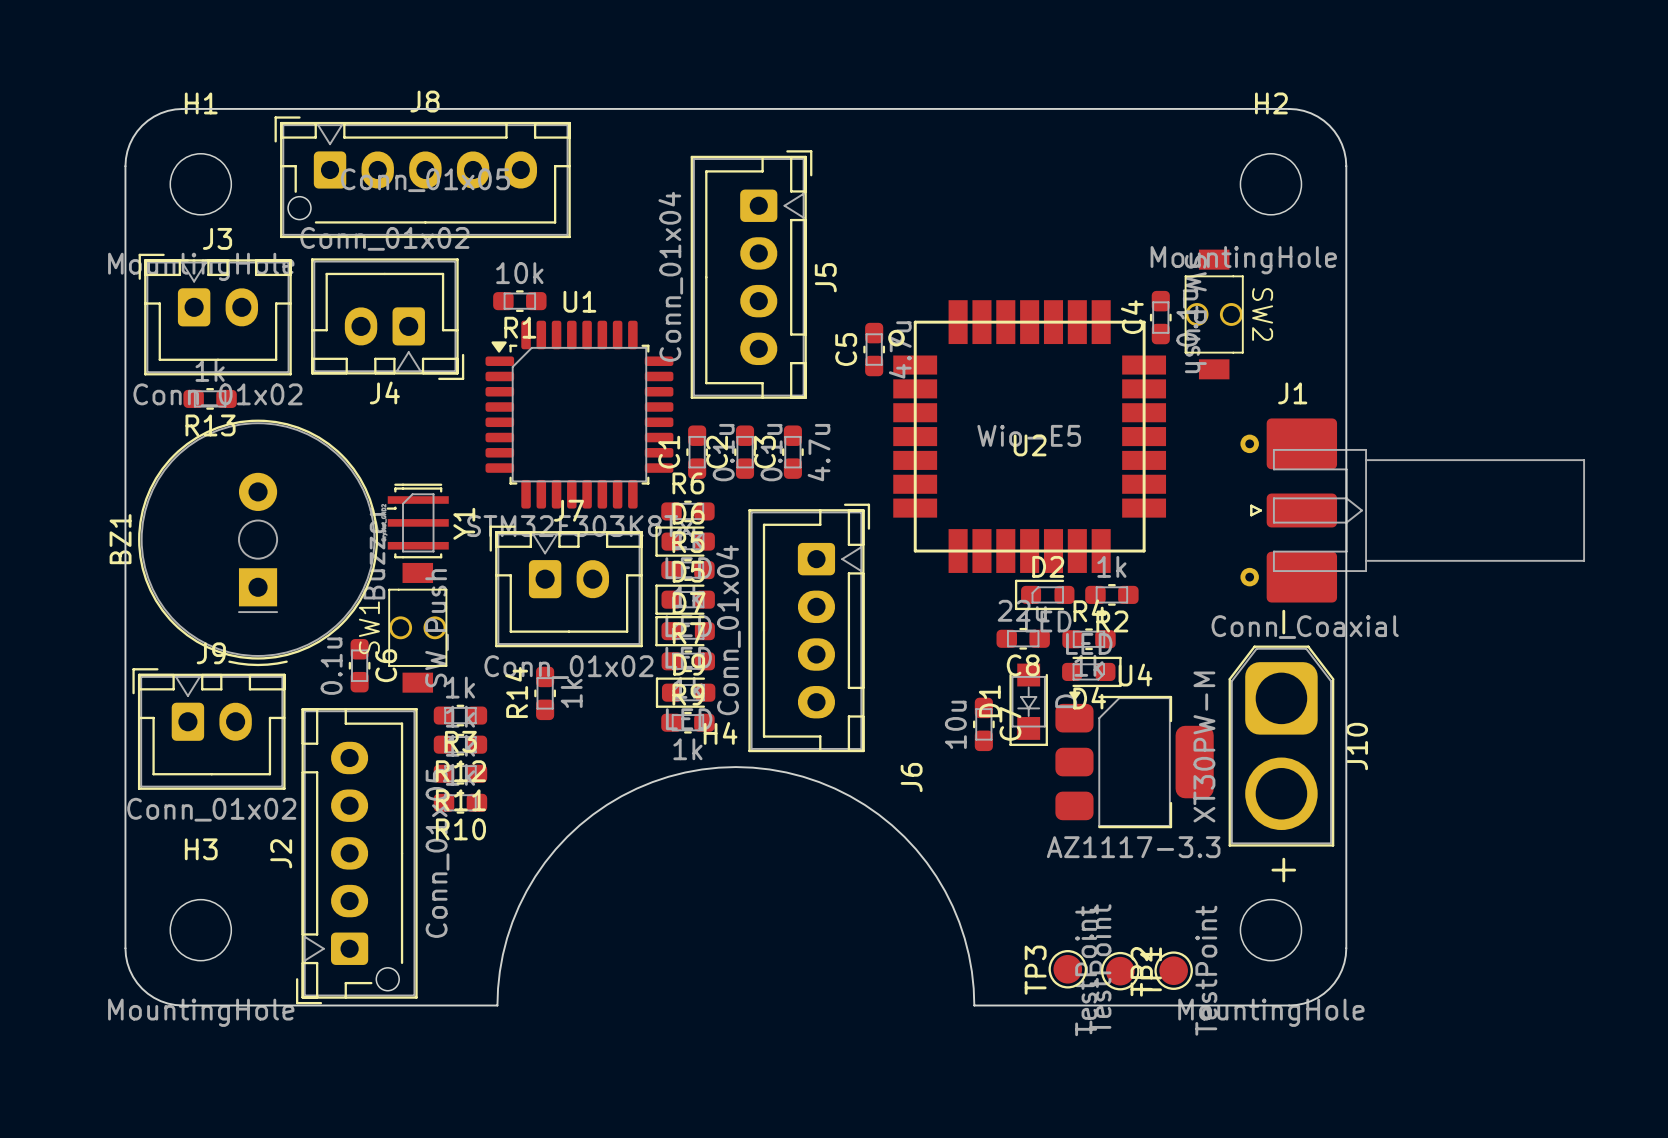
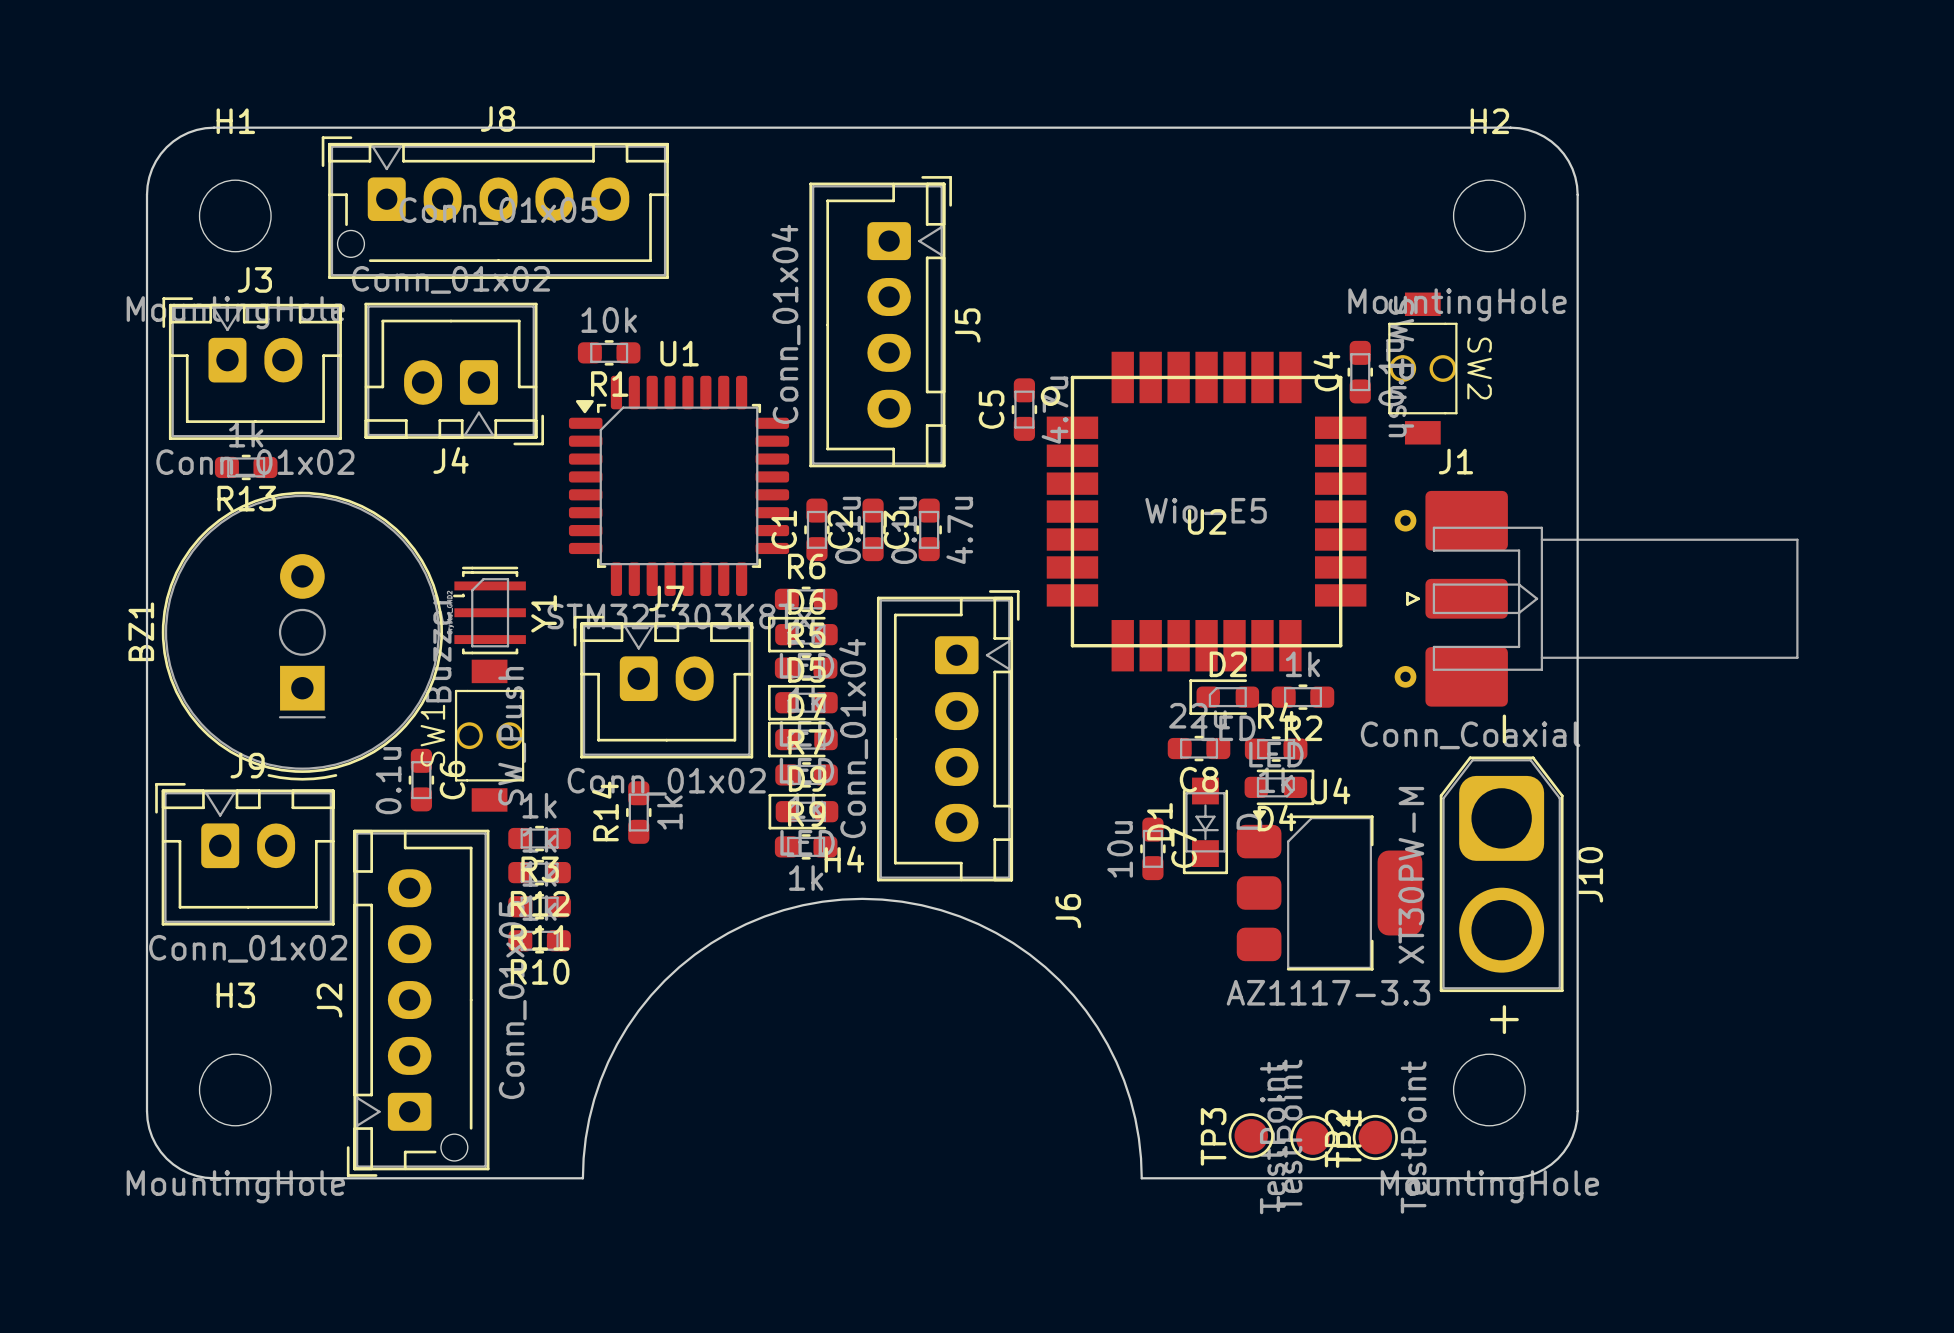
J1 position: (1412, 510) -> (1596, 598)

